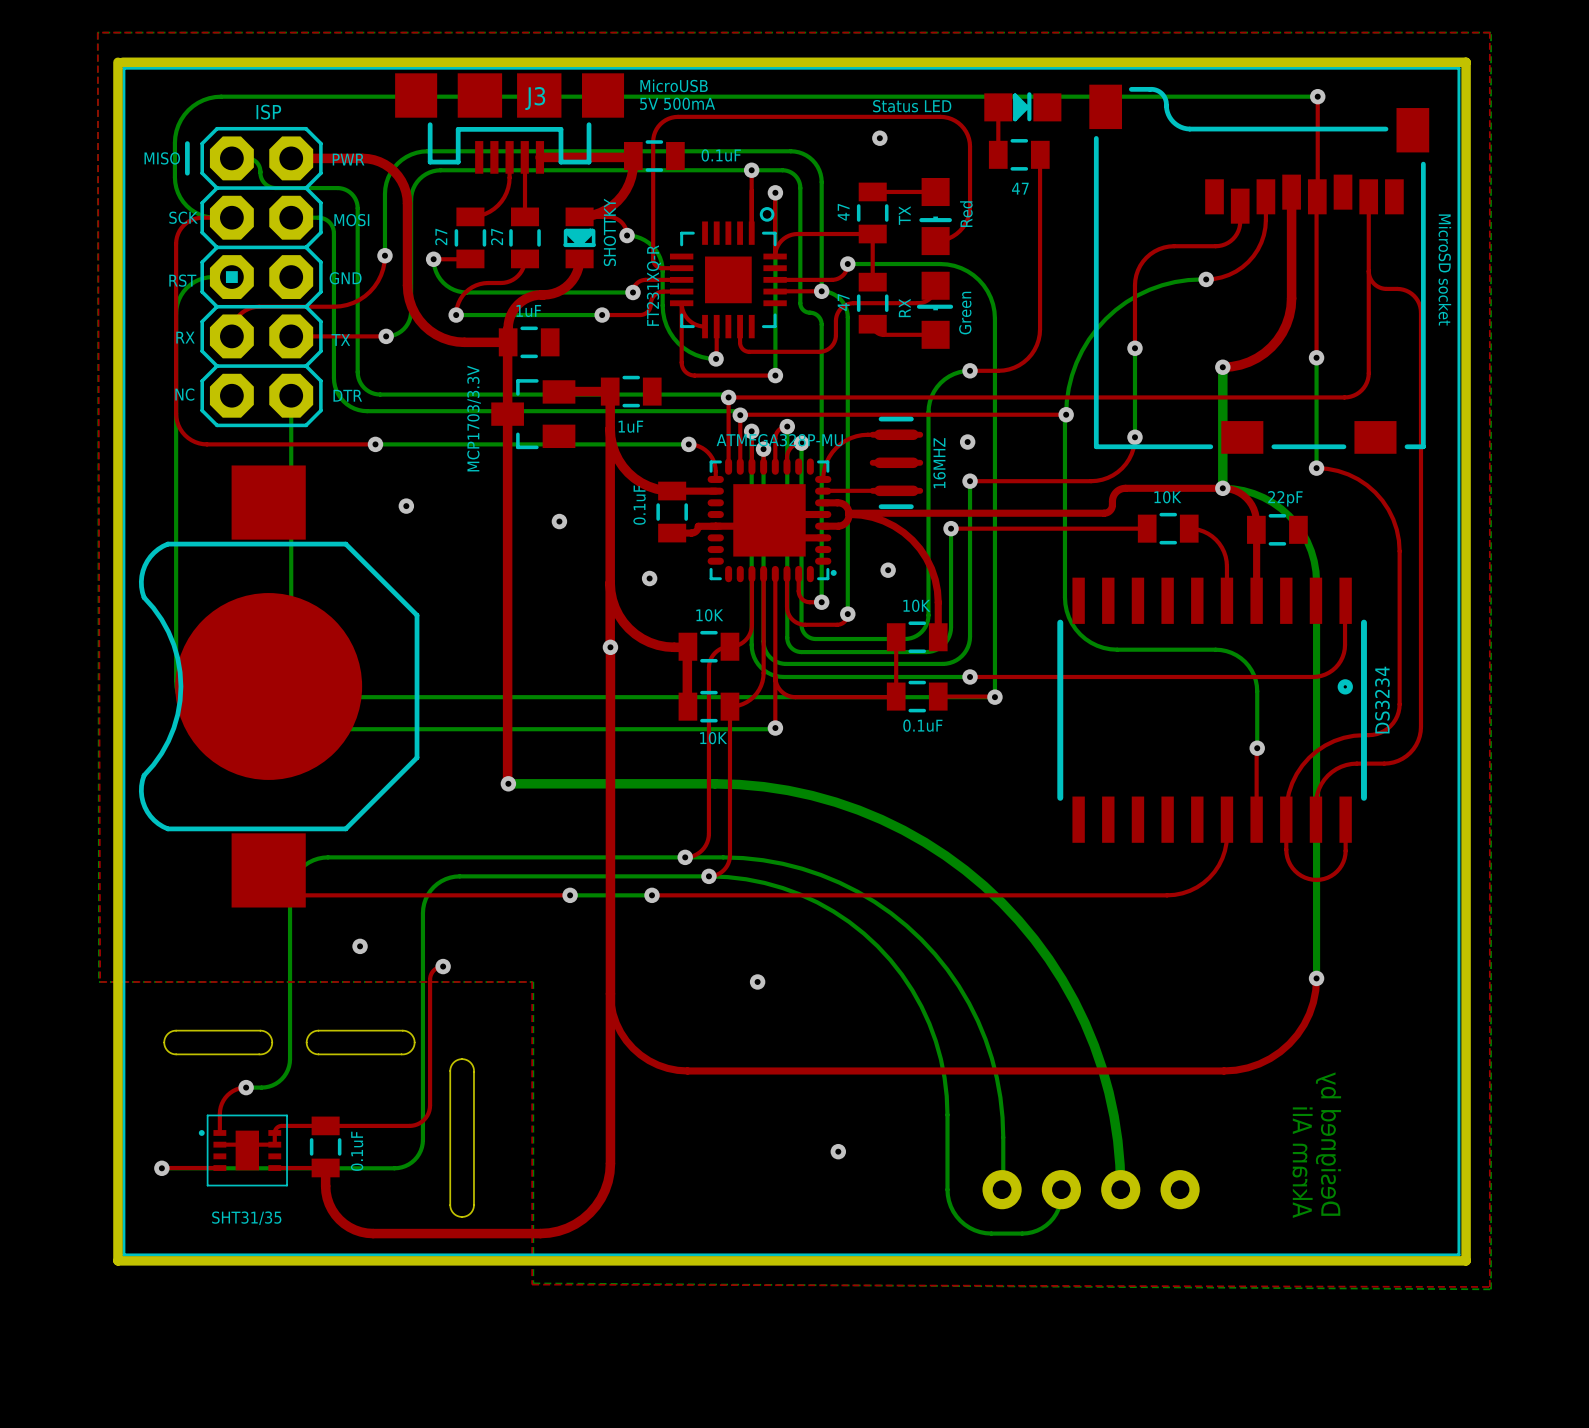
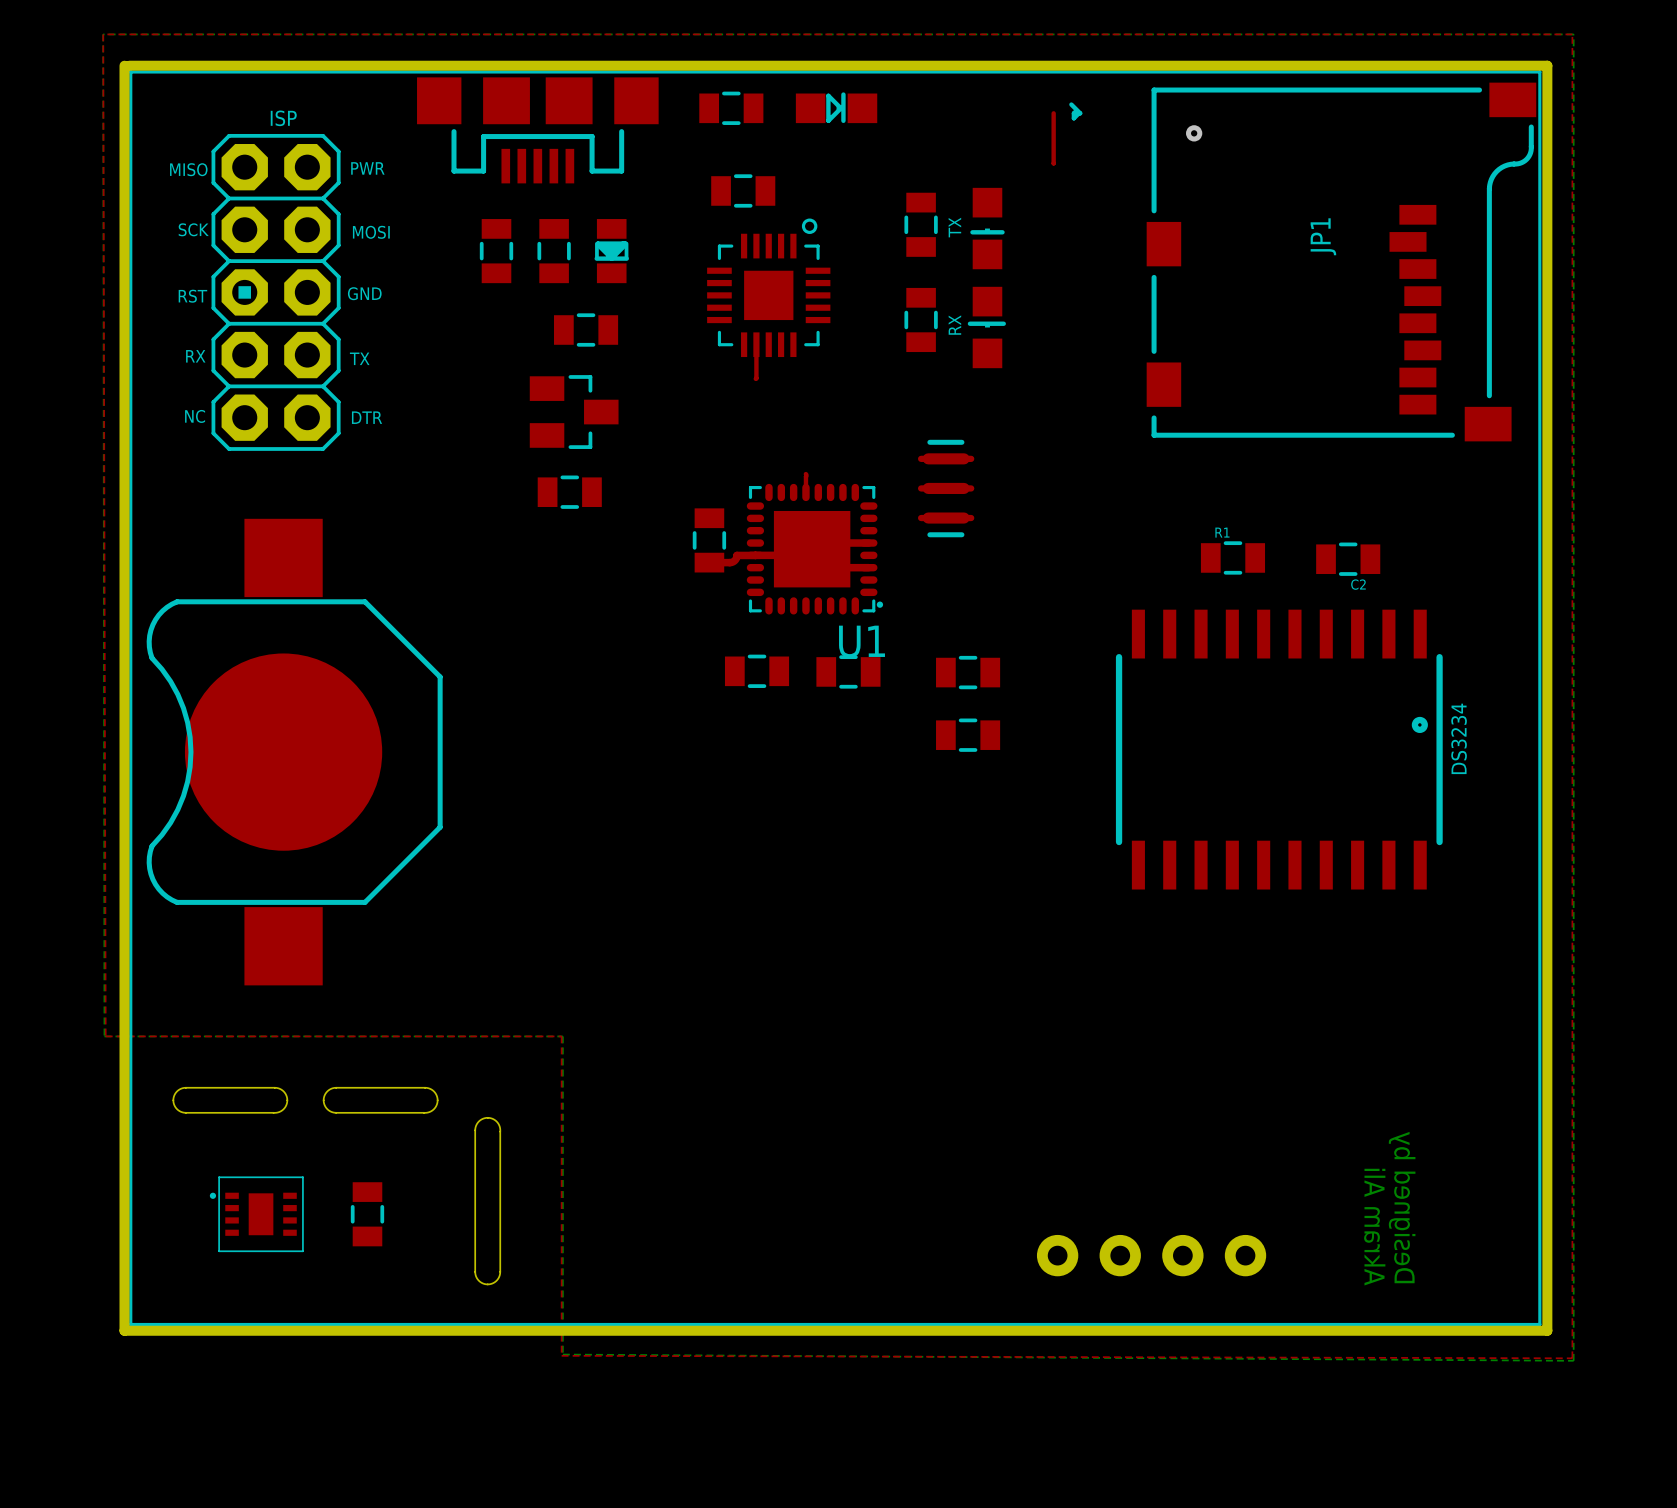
text: MicroUSB (674, 85) -> none
line: (1029, 94) (1029, 119) -> (843, 94) (843, 120)
line: (1015, 95) (1027, 107) (1015, 119) (1015, 95) -> (828, 95) (840, 108) (828, 120) (828, 95)
top track: (1317, 96) (1316, 357) -> none
bottom track: (1317, 96) (215, 97) (203, 100) (193, 106) (184, 114) (178, 125) (174, 142) (175, 182) (183, 201) (195, 212) (210, 217) (231, 217) -> none
via: (1317, 96) -> none
J3 name: J3 (535, 98) -> none
part: none -> (731, 108)
part: none -> (836, 108)
text: 5V 500mA (677, 103) -> none
part: Status LED (1022, 107) -> none
part footprint: [185, 126, 323, 428] -> [211, 133, 341, 451]
via: none -> (1194, 133)
via: (879, 138) -> none
part: 47 (1019, 154) -> none
top track: (1040, 154) (1038, 340) (1027, 358) (1014, 367) (1003, 370) (970, 370) -> none
part: 0.1uF (654, 156) -> none
top track: (509, 157) (509, 182) (504, 197) (490, 211) (470, 216) -> none
top track: (524, 157) (525, 216) -> none
top track: (539, 157) (633, 156) (632, 170) (629, 183) (617, 201) (600, 212) (579, 216) (615, 218) (624, 226) (627, 235) -> none
text position: MISO (162, 158) -> MISO (188, 169)
bottom track: (231, 158) (249, 158) (255, 161) (259, 166) (262, 180) (271, 187) (340, 188) (349, 192) (354, 198) (357, 208) (357, 374) (362, 385) (371, 392) (380, 394) (725, 394) (728, 398) -> none
top track: (291, 158) (368, 158) (379, 161) (389, 167) (401, 180) (407, 197) (408, 292) (411, 307) (419, 320) (429, 330) (449, 340) (508, 342) -> none
via: (751, 170) -> none
part: none -> (743, 190)
top track: (872, 191) (935, 192) -> none
top track: (775, 192) (775, 256) (779, 242) (791, 234) (872, 234) (872, 282) -> none
bottom track: (775, 192) (775, 375) -> none
via: (775, 192) -> none
top track: (1291, 192) (1291, 298) (1286, 324) (1277, 340) (1264, 353) (1249, 362) (1222, 367) -> none
top track: (1265, 196) (1263, 235) (1253, 256) (1242, 267) (1229, 274) (1206, 279) -> none
top track: (1368, 196) (1368, 376) (1363, 387) (1353, 395) (1344, 397) (728, 397) (728, 466) -> none
top track: (1240, 206) (1239, 228) (1235, 236) (1227, 242) (1218, 246) (1164, 247) (1150, 254) (1143, 261) (1135, 280) (1134, 348) -> none
part value: 47 (843, 212) -> none
TX value: Red (966, 214) -> none
top track: (231, 217) (192, 219) (181, 227) (177, 237) (176, 413) (180, 428) (191, 440) (202, 444) (375, 444) -> none
bottom track: (291, 217) (322, 218) (329, 222) (333, 229) (334, 382) (340, 398) (354, 408) (367, 411) (736, 411) (740, 415) -> none
part value: SHOTTKY (609, 232) -> none
bottom track: (627, 235) (640, 238) (648, 242) (659, 257) (662, 271) (663, 312) (666, 325) (673, 338) (683, 347) (695, 354) (716, 358) -> none
via: (627, 235) -> none
part value: 27 (441, 236) -> none
part value: 27 (497, 236) -> none
top track: (935, 241) (948, 238) (956, 233) (965, 223) (969, 211) (969, 142) (963, 128) (951, 119) (940, 116) (674, 117) (660, 124) (653, 138) (653, 259) (655, 264) (659, 267) (681, 268) -> none
JP1: none -> (1341, 262)
top track: (384, 255) (383, 268) (378, 281) (370, 291) (359, 299) (340, 306) (252, 307) (237, 317) (232, 326) (231, 336) -> none
bottom track: (384, 255) (386, 182) (397, 163) (416, 152) (790, 151) (798, 152) (809, 157) (817, 166) (821, 178) (821, 291) (837, 296) (844, 304) (847, 314) (847, 614) -> none
via: (384, 255) -> none
top track: (470, 258) (433, 259) -> none
top track: (525, 258) (521, 270) (512, 279) (504, 282) (479, 284) (468, 289) (458, 302) (456, 315) -> none
top track: (579, 258) (576, 272) (565, 287) (552, 293) (528, 297) (515, 307) (509, 319) (508, 342) -> none
bottom track: (433, 259) (436, 271) (443, 282) (454, 289) (462, 292) (633, 292) -> none
via: (433, 259) -> none
top track: (847, 264) (844, 273) (836, 279) (775, 279) -> none
bottom track: (847, 264) (940, 264) (954, 265) (967, 271) (978, 280) (990, 297) (994, 318) (994, 697) (331, 697) (316, 694) (299, 681) (291, 662) (291, 395) -> none
via: (847, 264) -> none
part: MicroSD socket (1259, 269) -> none
top track: (1368, 271) (1371, 280) (1377, 286) (1403, 289) (1411, 293) (1417, 300) (1420, 309) (1420, 731) (1413, 749) (1398, 760) (1389, 763) (1351, 763) (1331, 772) (1321, 784) (1317, 793) (1315, 819) -> none
bottom track: (231, 277) (208, 277) (194, 281) (183, 291) (176, 309) (176, 680) (177, 693) (182, 704) (195, 719) (212, 727) (224, 729) (775, 728) -> none
top track: (681, 279) (642, 280) (635, 284) (633, 292) -> none
bottom track: (1206, 279) (1188, 280) (1162, 285) (1126, 302) (1096, 328) (1076, 362) (1068, 388) (1064, 415) (1065, 604) (1068, 617) (1080, 634) (1091, 642) (1103, 647) (1117, 649) (1221, 650) (1240, 658) (1251, 670) (1256, 685) (1257, 748) -> none
via: (1206, 279) -> none
part value: FT231XQ-R (653, 285) -> none
top track: (935, 285) (932, 296) (922, 302) (853, 303) (844, 305) (836, 316) (834, 341) (831, 346) (823, 351) (746, 351) (740, 344) (740, 326) -> none
top track: (681, 291) (657, 293) (651, 299) (648, 310) (642, 314) (602, 315) -> none
top track: (821, 291) (775, 291) -> none
via: (821, 291) -> none
via: (633, 292) -> none
part value: 47 (843, 302) -> none
part: none -> (586, 330)
RX value: Green (965, 313) -> none
bottom track: (456, 315) (602, 315) -> none
via: (456, 315) -> none
via: (602, 315) -> none
top track: (872, 324) (874, 330) (881, 334) (935, 334) -> none
top track: (705, 326) (696, 324) (688, 319) (683, 312) (681, 303) (681, 364) (686, 372) (694, 375) (775, 375) -> none
top track: (291, 336) (386, 336) -> none
bottom track: (386, 336) (401, 331) (410, 317) (411, 196) (417, 181) (429, 172) (440, 170) (782, 170) (791, 172) (797, 179) (800, 185) (800, 305) (805, 311) (817, 315) (821, 322) (821, 602) -> none
via: (386, 336) -> none
top track: (508, 342) (508, 783) -> none
part: 1uF (529, 342) -> none
bottom track: (1134, 348) (1134, 437) -> none
via: (1134, 348) -> none
bottom track: (1316, 357) (1316, 468) -> none
via: (1316, 357) -> none
via: (716, 358) -> none
bottom track: (1222, 367) (1222, 488) (1253, 493) (1281, 508) (1302, 532) (1311, 551) (1315, 571) (1316, 978) -> none
via: (1222, 367) -> none
bottom track: (970, 370) (959, 372) (944, 379) (937, 387) (929, 401) (928, 618) (923, 629) (913, 637) (904, 639) (815, 639) (808, 637) (803, 631) (801, 624) (801, 443) -> none
via: (970, 370) -> none
via: (775, 375) -> none
part: none -> (574, 412)
top track: (559, 391) (610, 391) (610, 1163) (605, 1190) (595, 1206) (583, 1219) (567, 1228) (549, 1232) (366, 1233) (349, 1227) (339, 1219) (332, 1209) (326, 1192) (325, 1167) (274, 1168) -> none
part: 1uF (631, 391) -> none
via: (728, 397) -> none
part: MCP1703/3.3V (533, 414) -> none
top track: (1066, 414) (740, 414) (740, 466) -> none
via: (1066, 414) -> none
via: (740, 415) -> none
top track: (787, 426) (780, 429) (775, 435) (775, 466) -> none
bottom track: (787, 426) (787, 637) (789, 644) (794, 650) (801, 652) (926, 652) (941, 646) (947, 639) (950, 630) (951, 528) -> none
via: (787, 426) -> none
top track: (610, 429) (612, 445) (618, 460) (628, 472) (641, 482) (664, 490) (715, 491) -> none
top track: (751, 431) (751, 466) -> none
bottom track: (751, 431) (751, 644) (754, 657) (761, 667) (771, 674) (783, 676) (970, 676) -> none
via: (751, 431) -> none
top track: (872, 434) (850, 438) (836, 447) (826, 462) (823, 479) -> none
top track: (1134, 437) (1131, 454) (1125, 464) (1113, 475) (1102, 479) (970, 481) -> none
via: (1134, 437) -> none
U1 value: ATMEGA328P-MU (779, 440) -> none
via: (967, 442) -> none
top track: (801, 443) (794, 445) (788, 450) (787, 466) -> none
via: (801, 443) -> none
bottom track: (375, 444) (688, 444) -> none
via: (375, 444) -> none
top track: (688, 444) (699, 446) (710, 454) (714, 464) (715, 479) -> none
via: (688, 444) -> none
bottom track: (763, 449) (763, 644) (770, 657) (783, 663) (942, 663) (953, 661) (962, 655) (967, 647) (970, 636) (970, 481) -> none
via: (763, 449) -> none
part value: 16MHZ (939, 463) -> none
part: none -> (569, 492)
top track: (1316, 468) (1348, 474) (1375, 492) (1393, 519) (1398, 540) (1398, 712) (1393, 723) (1380, 732) (1343, 737) (1325, 745) (1309, 757) (1296, 774) (1288, 792) (1286, 812) (1286, 853) (1290, 864) (1295, 871) (1304, 877) (1316, 879) (1327, 877) (1337, 871) (1345, 854) (1345, 819) -> none
via: (1316, 468) -> none
via: (970, 481) -> none
via: (1222, 488) -> none
top track: (872, 490) (823, 491) -> none
R1 value: 10K (1167, 497) -> none
C2 value: 22pF (1285, 498) -> none
top track: (823, 502) (841, 503) (847, 507) (848, 513) -> none
R1 name: none -> R1 (1222, 532)
part value: 0.1uF (639, 505) -> none
via: (406, 506) -> none
top track: (848, 513) (1104, 513) (1111, 509) (1115, 493) (1123, 488) (1231, 489) (1246, 498) (1255, 513) (1256, 601) -> none
top track: (848, 514) (861, 515) (883, 521) (903, 532) (920, 548) (931, 568) (935, 579) (938, 602) (938, 637) -> none
top track: (848, 514) (847, 520) (842, 525) (823, 526) -> none
via: (559, 521) -> none
top track: (951, 528) (1147, 528) -> none
via: (951, 528) -> none
top track: (1189, 528) (1208, 533) (1221, 547) (1226, 561) (1226, 600) -> none
C2 name: none -> C2 (1358, 584)
via: (888, 570) -> none
top track: (751, 574) (750, 633) (740, 643) (717, 651) (709, 662) (708, 836) (702, 850) (694, 855) (685, 857) -> none
top track: (763, 574) (763, 677) (759, 689) (750, 699) (738, 705) (729, 706) (729, 858) (723, 870) (717, 874) (708, 876) -> none
top track: (775, 574) (775, 727) -> none
top track: (787, 574) (787, 609) (789, 615) (796, 622) (805, 624) (838, 624) (844, 621) (847, 614) -> none
top track: (798, 574) (798, 592) (800, 597) (806, 601) (821, 602) -> none
via: (649, 578) -> none
top track: (610, 583) (612, 599) (618, 615) (635, 634) (657, 645) (687, 647) -> none
top track: (1345, 600) (1343, 653) (1335, 667) (1321, 675) (970, 676) -> none
via: (821, 602) -> none
part value: 10K (916, 605) -> none
U1 name: none -> U1 (861, 641)
via: (847, 614) -> none
part value: 10K (709, 615) -> none
part: none -> (848, 671)
top track: (896, 637) (895, 697) (792, 696) (781, 691) (776, 684) (775, 676) -> none
part position: (708, 646) -> (757, 671)
via: (610, 647) -> none
top track: (687, 647) (687, 706) -> none
via: (970, 676) -> none
part position: (279, 686) -> (294, 752)
top track: (938, 696) (994, 697) -> none
via: (994, 697) -> none
part: 10K (708, 706) -> none
part value: 0.1uF (922, 725) -> none
via: (775, 728) -> none
top track: (1257, 748) (1256, 819) -> none
via: (1257, 748) -> none
bottom track: (508, 783) (714, 783) (788, 790) (835, 802) (881, 819) (945, 855) (984, 885) (1018, 920) (1048, 959) (1074, 1001) (1094, 1045) (1108, 1092) (1117, 1140) (1120, 1189) -> none
via: (508, 783) -> none
top track: (1226, 819) (1224, 850) (1214, 871) (1196, 887) (1174, 894) (651, 895) -> none
via: (685, 857) -> none
via: (708, 876) -> none
top track: (269, 895) (273, 889) (274, 887) (274, 884) (274, 882) (268, 870) (270, 879) (272, 882) (273, 885) (275, 888) (290, 895) (570, 895) -> none
bottom track: (570, 895) (651, 895) -> none
via: (570, 895) -> none
via: (651, 895) -> none
via: (360, 946) -> none
top track: (443, 966) (433, 970) (430, 977) (430, 1105) (427, 1115) (422, 1121) (409, 1125) (280, 1125) (275, 1131) (274, 1144) (251, 1144) (247, 1150) (242, 1144) (219, 1144) -> none
via: (443, 966) -> none
top track: (1316, 978) (1315, 990) (1309, 1013) (1297, 1034) (1289, 1043) (1270, 1058) (1259, 1063) (1247, 1067) (1223, 1070) (677, 1070) (649, 1060) (633, 1048) (616, 1023) (610, 993) -> none
via: (1316, 978) -> none
via: (757, 981) -> none
top track: (246, 1087) (233, 1091) (223, 1100) (220, 1110) (219, 1132) -> none
bottom track: (246, 1087) (272, 1085) (281, 1079) (289, 1066) (290, 890) (297, 872) (313, 860) (328, 857) (723, 857) (763, 860) (821, 875) (874, 901) (906, 925) (947, 969) (977, 1021) (991, 1058) (1002, 1117) (1002, 1189) (1002, 1174) -> none
via: (246, 1087) -> none
part position: (325, 1146) -> (367, 1214)
part value: 0.1uF (357, 1151) -> none
via: (838, 1151) -> none
bottom track: (161, 1168) (394, 1168) (405, 1166) (414, 1159) (420, 1150) (422, 1139) (423, 908) (427, 894) (441, 881) (459, 876) (708, 876) (764, 882) (817, 902) (863, 933) (901, 974) (921, 1006) (940, 1059) (946, 1096) (947, 1195) (953, 1211) (960, 1220) (974, 1230) (985, 1233) (1032, 1232) (1046, 1225) (1053, 1218) (1060, 1204) (1061, 1189) -> none
via: (161, 1168) -> none
top track: (219, 1168) (161, 1168) -> none
part value: SHT31/35 (246, 1218) -> none

